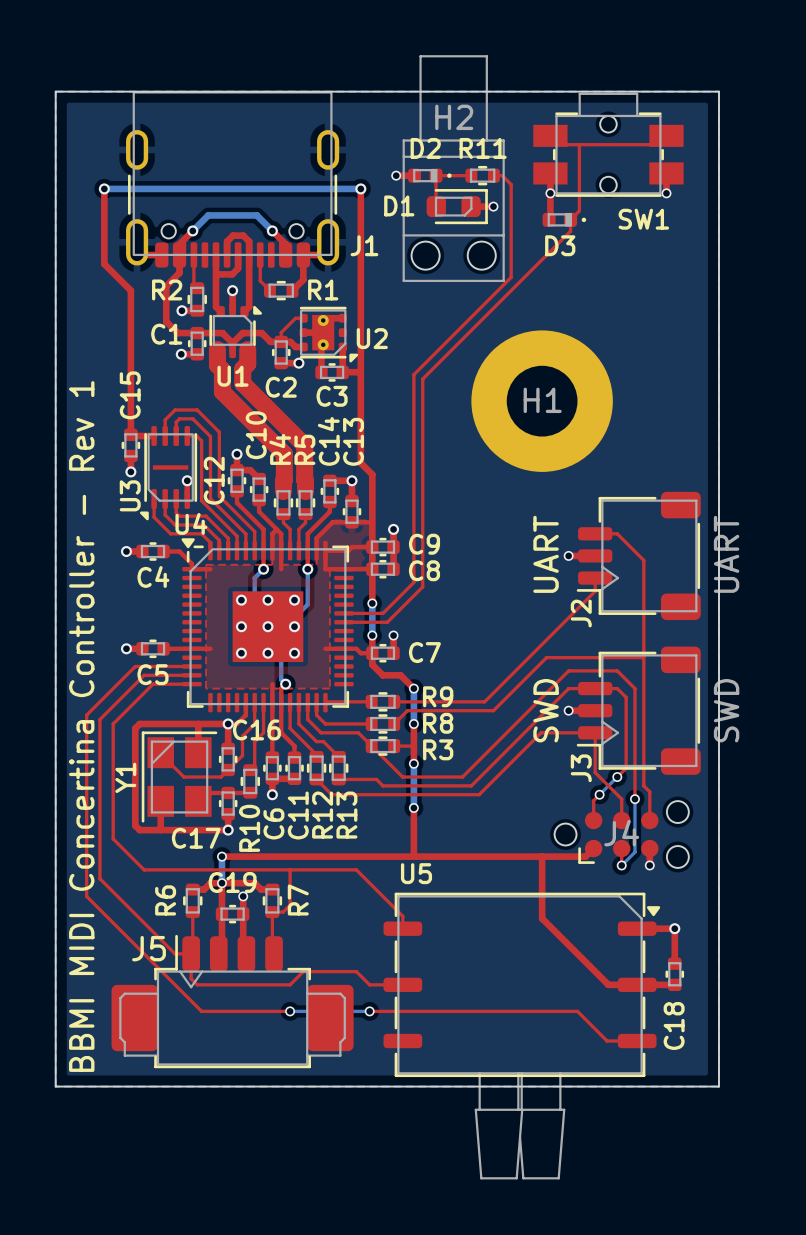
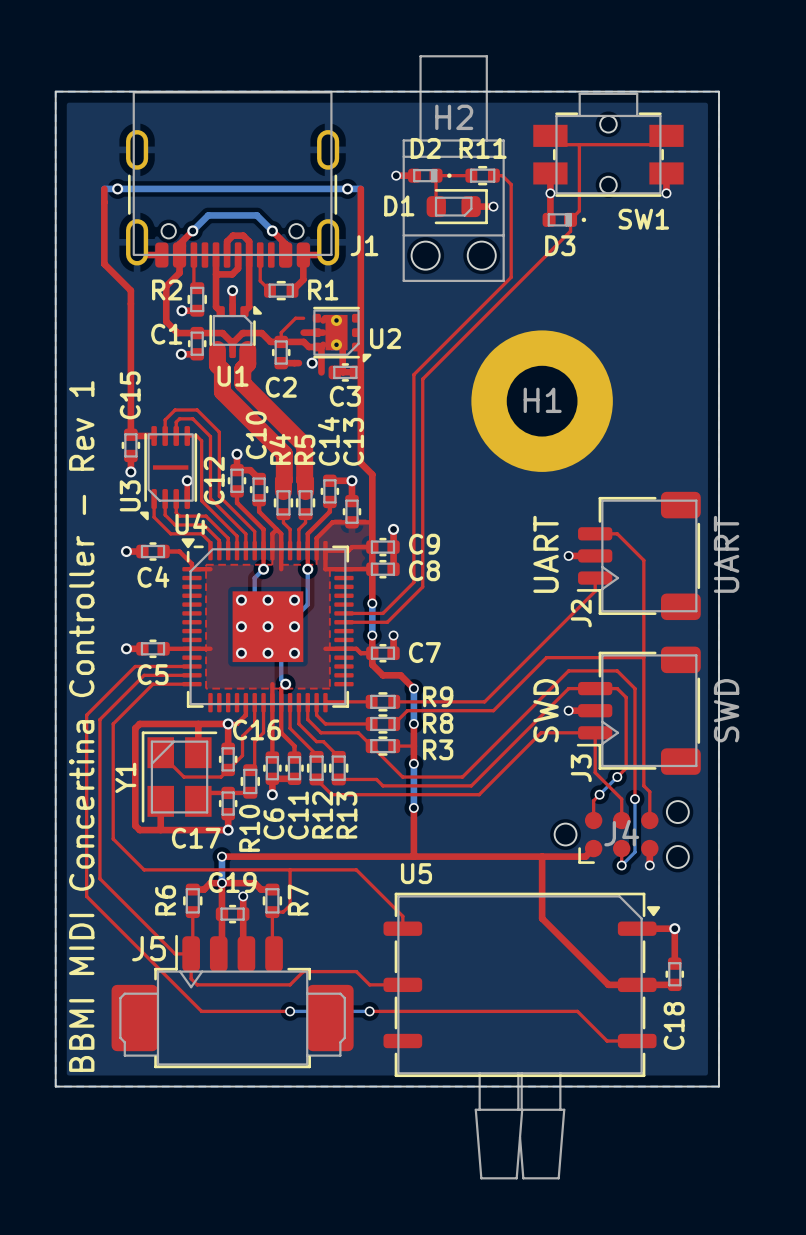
via position: (104, 188) -> (117, 188)
via position: (360, 188) -> (347, 188)
U2 position: (328, 334) -> (342, 334)
top track: (290, 341) (295, 347) (303, 347) -> (290, 341) (303, 341) (308, 347) (316, 347)
via position: (298, 363) -> (312, 363)
C3 position: (332, 372) -> (345, 372)

